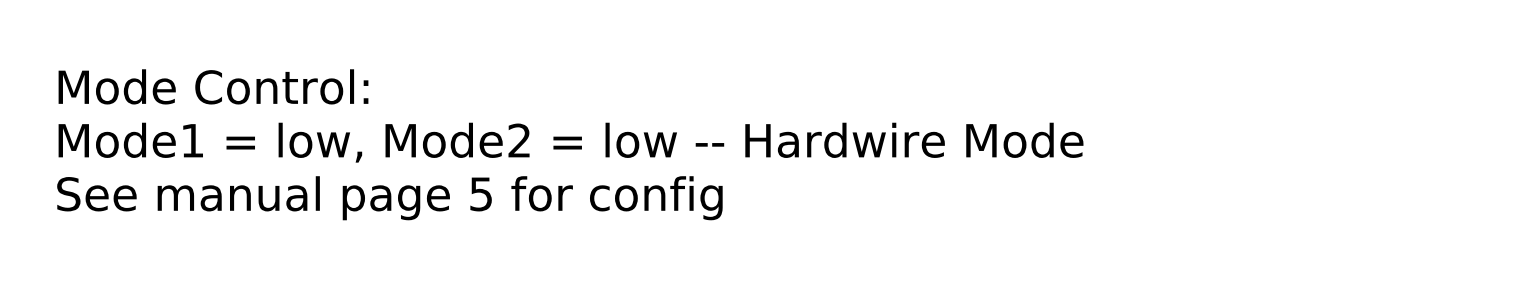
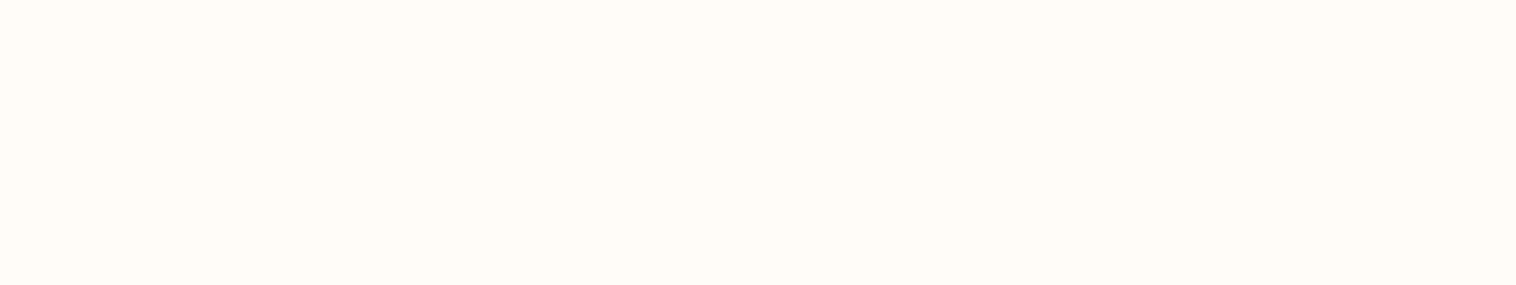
text: Mode Control: (213, 86) -> none
text: Mode1 = low, Mode2 = low -- Hardwire Mode (571, 142) -> none
text: See manual page 5 for config (389, 198) -> none

